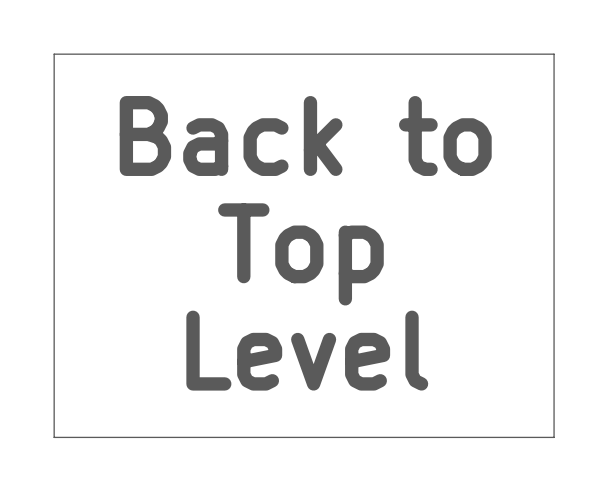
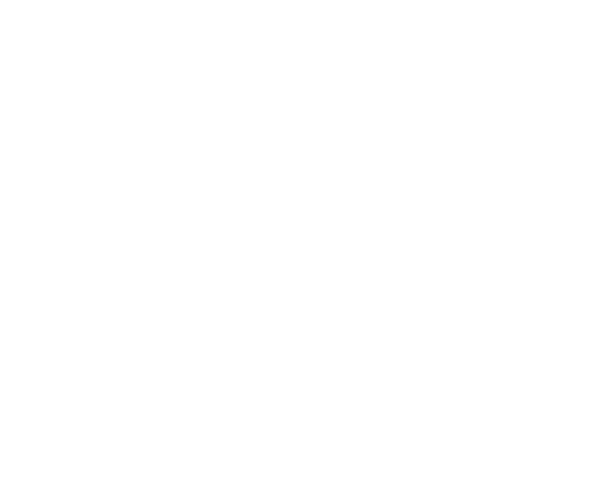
line: (54, 54) (554, 54) (554, 437) (54, 437) (54, 54) -> none
text: Back to (305, 135) -> none
text: Top (300, 254) -> none
text: Level (307, 350) -> none

